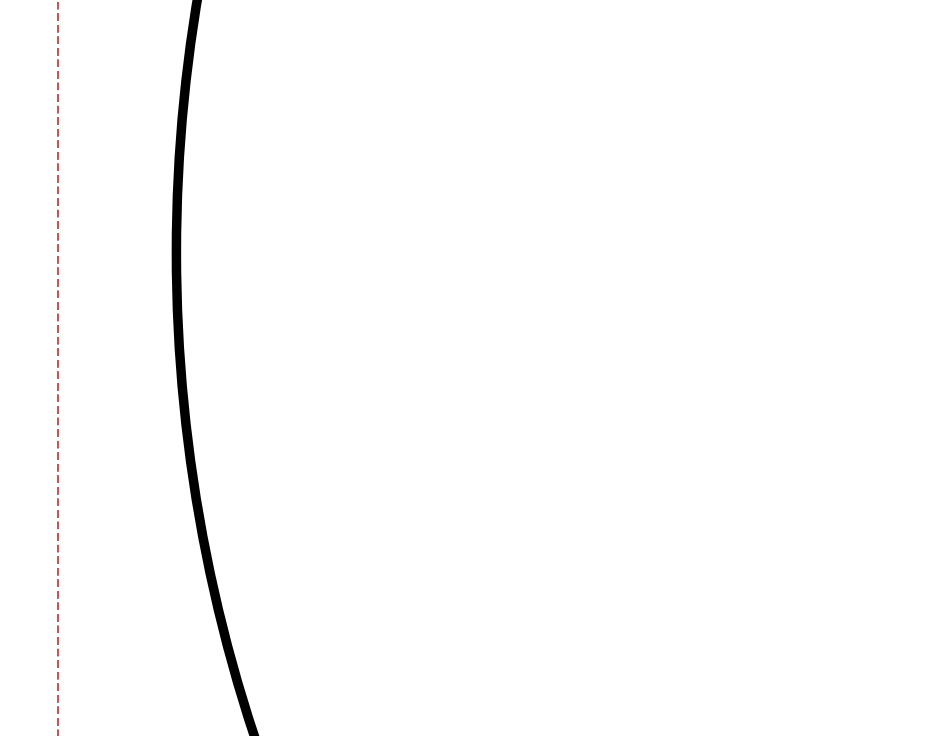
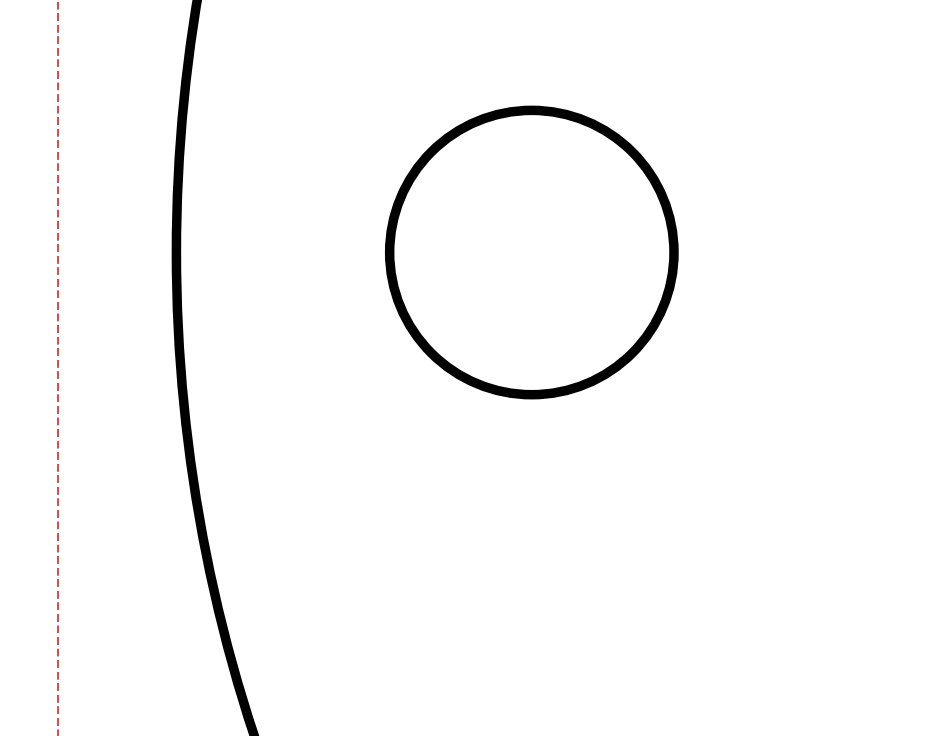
round board edge: none -> [384, 105, 679, 400]

